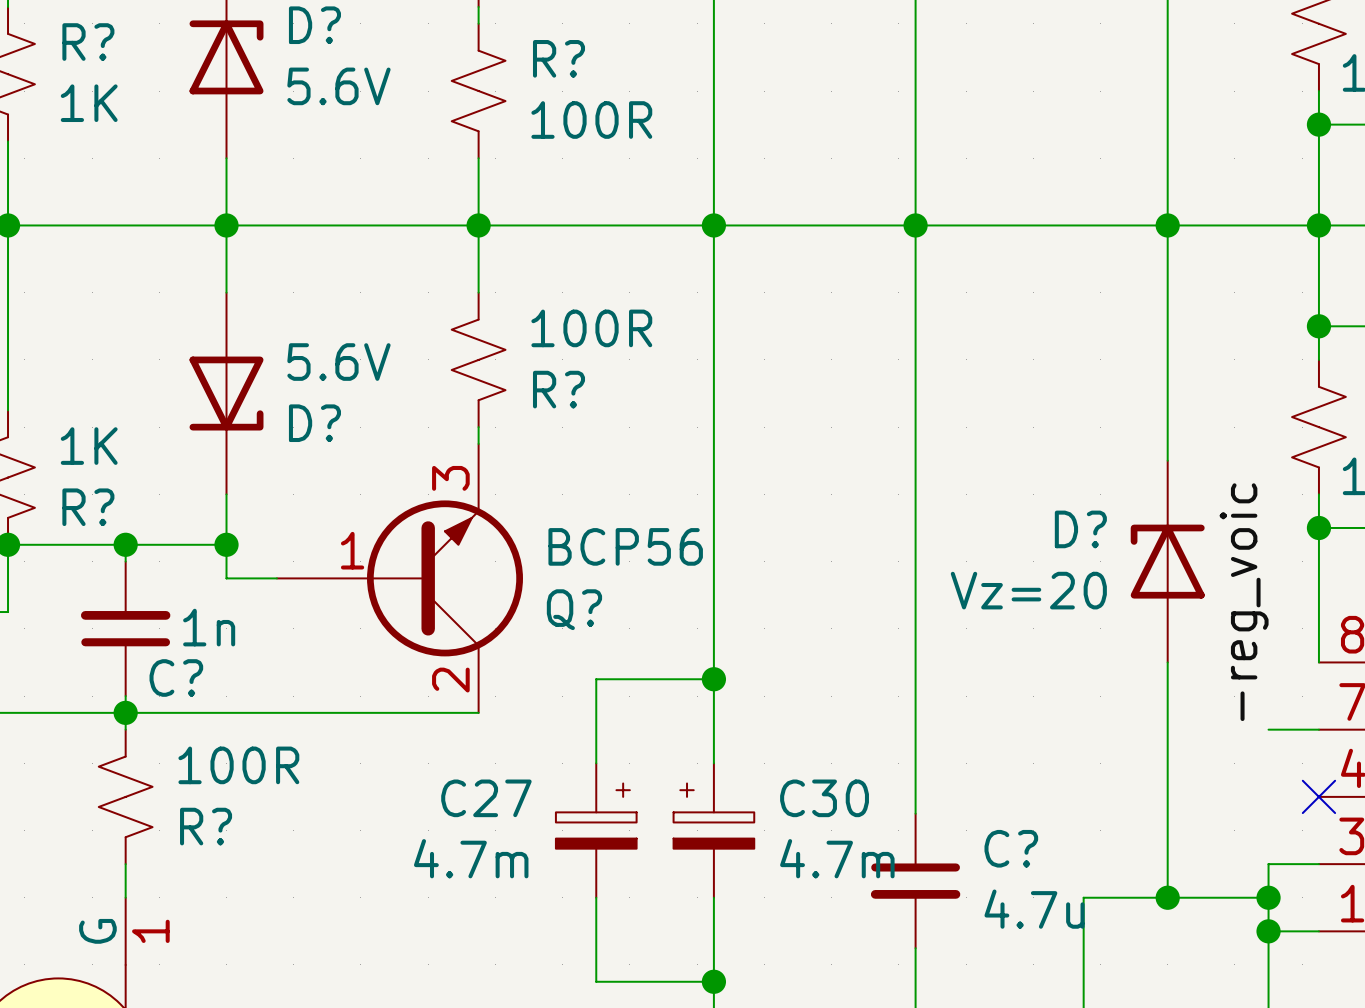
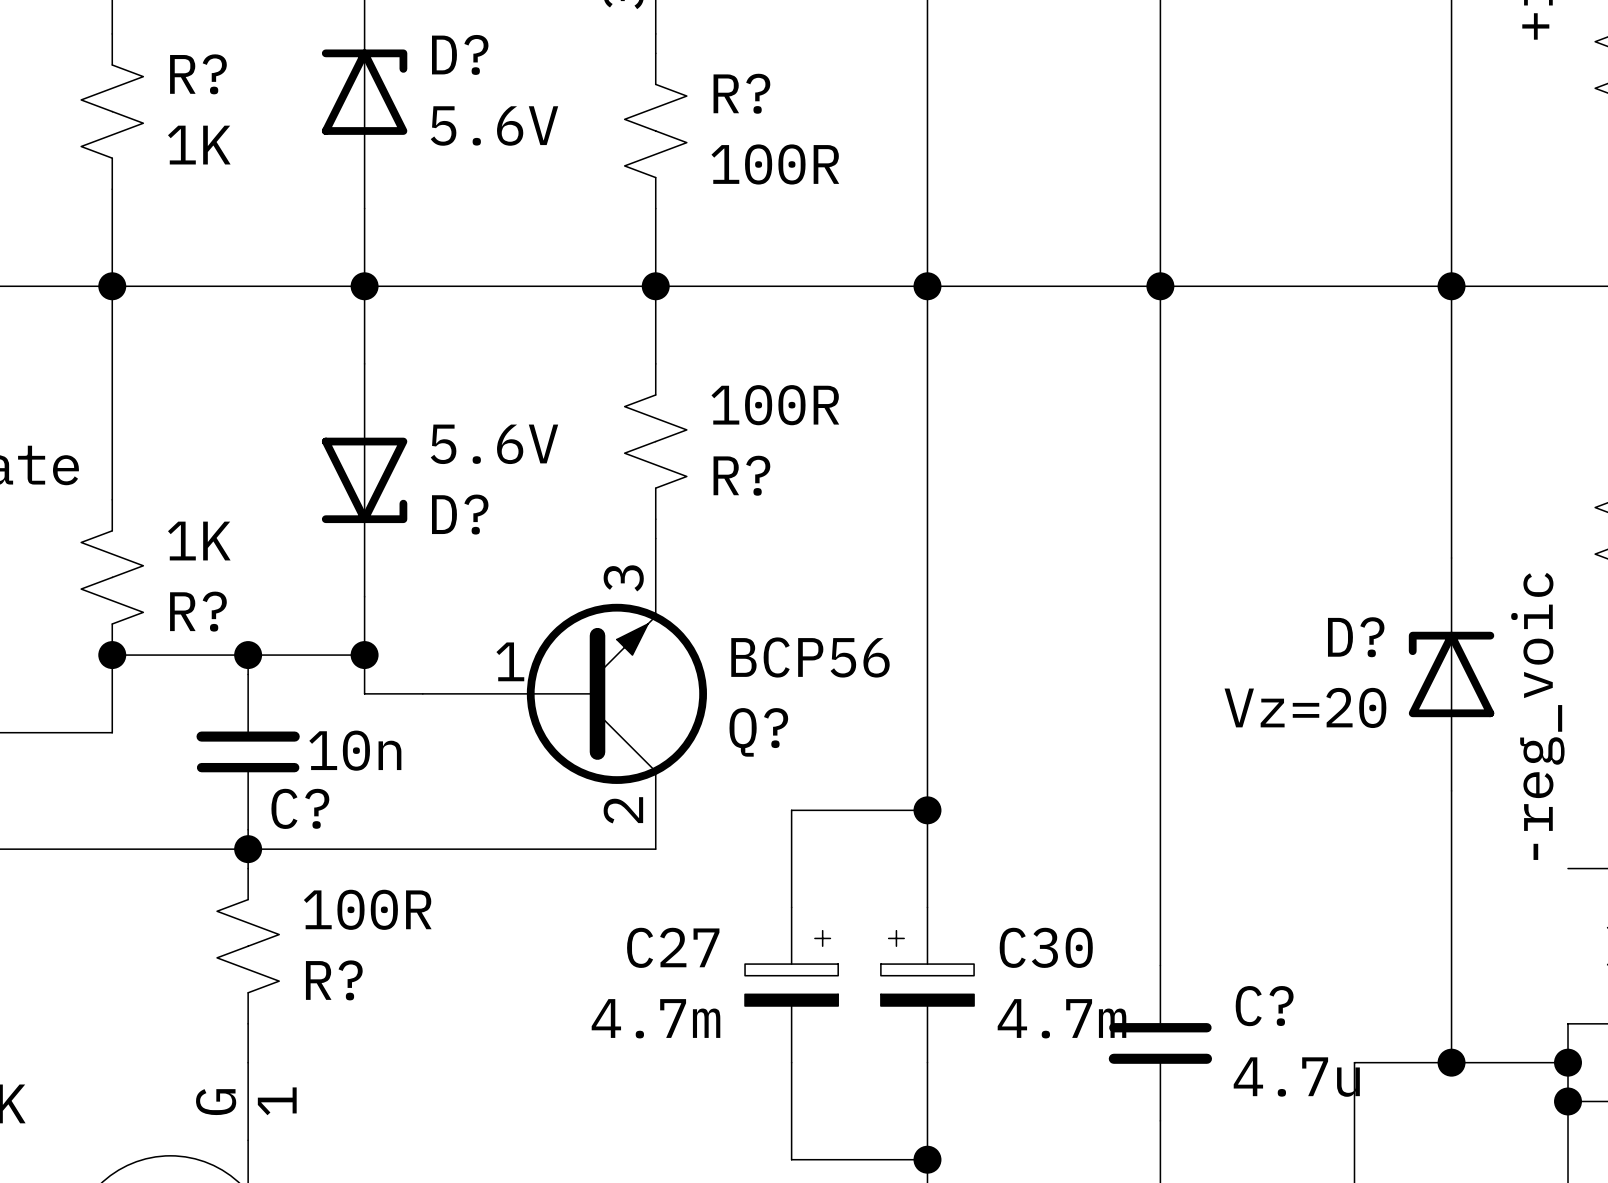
C? value: 1n (209, 627) -> 10n (355, 750)

